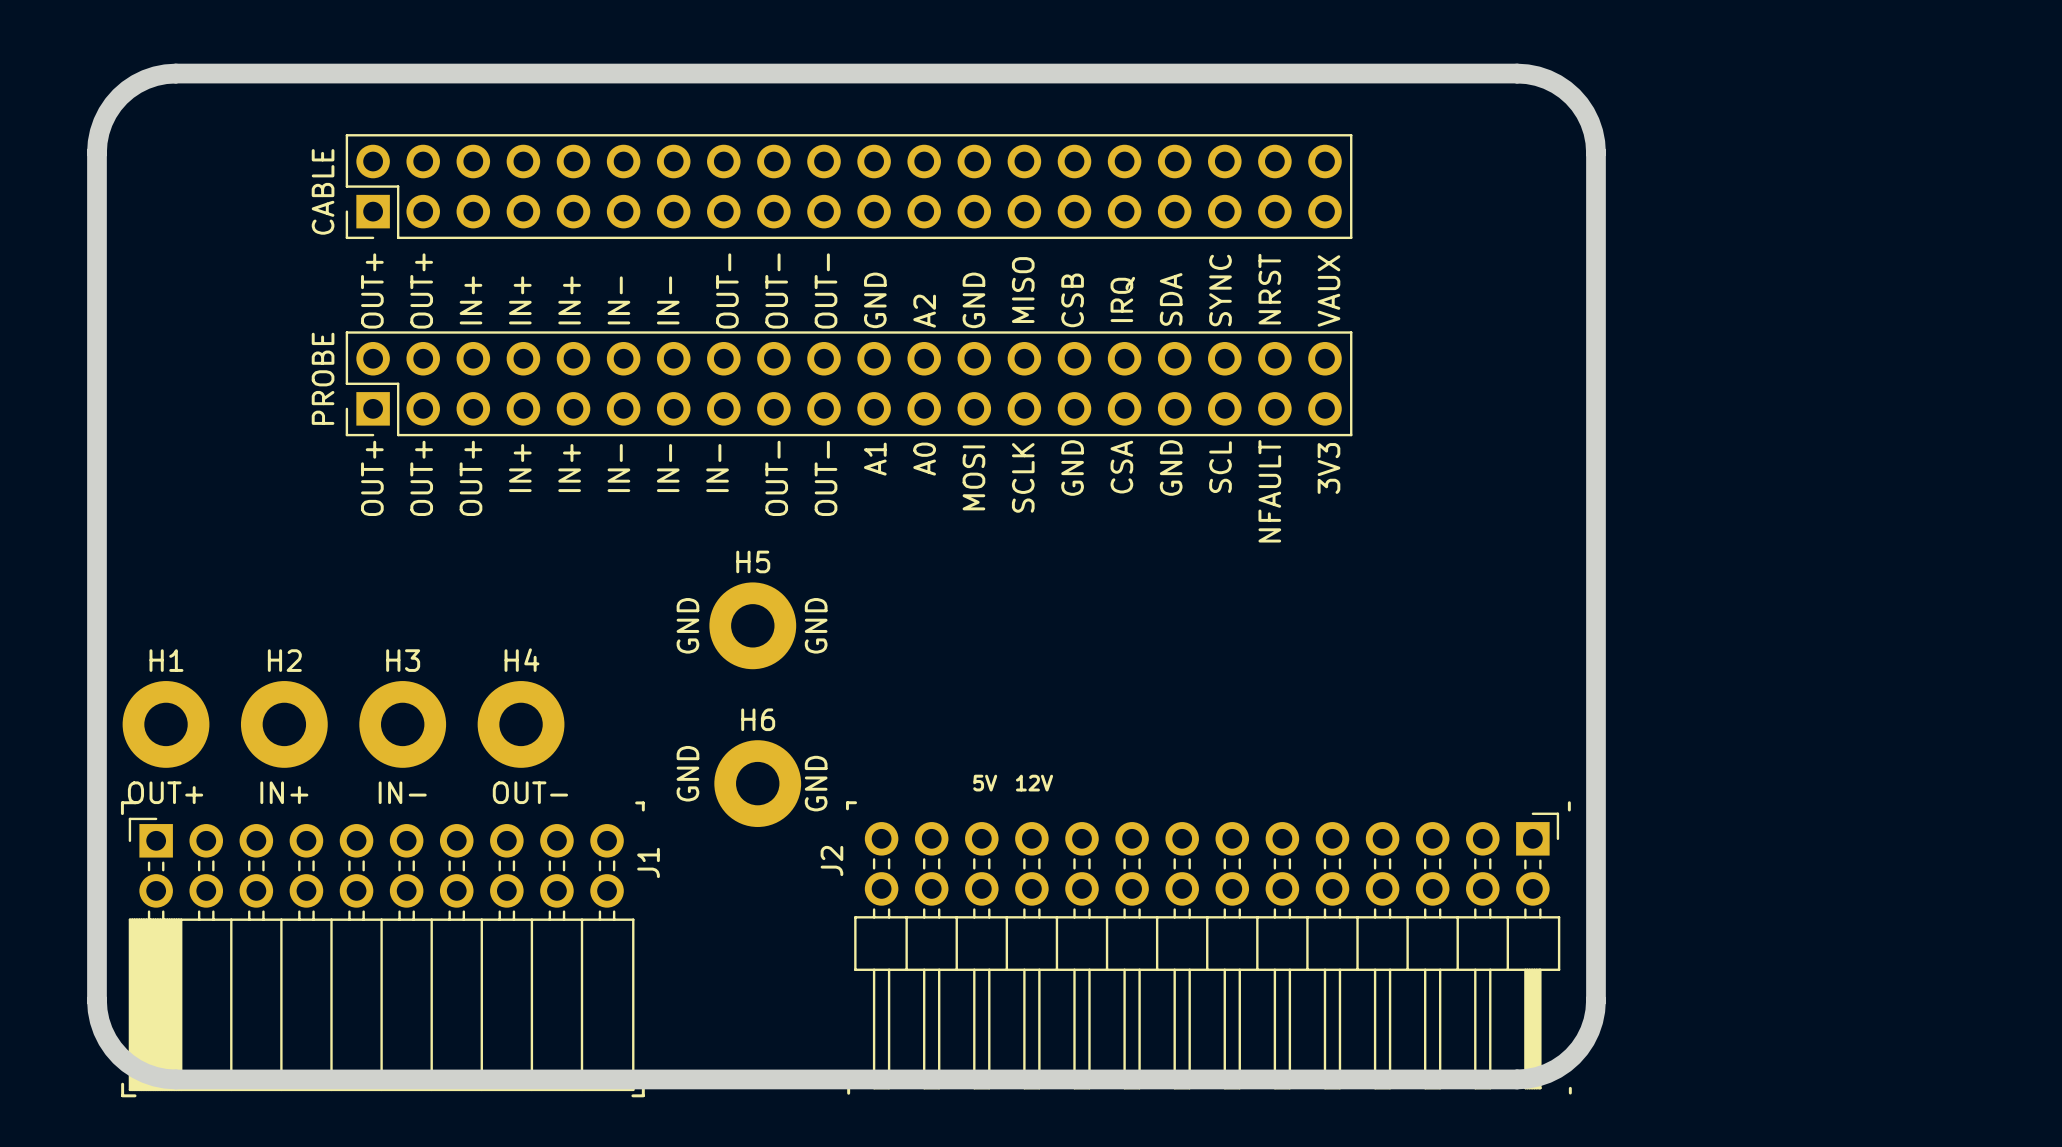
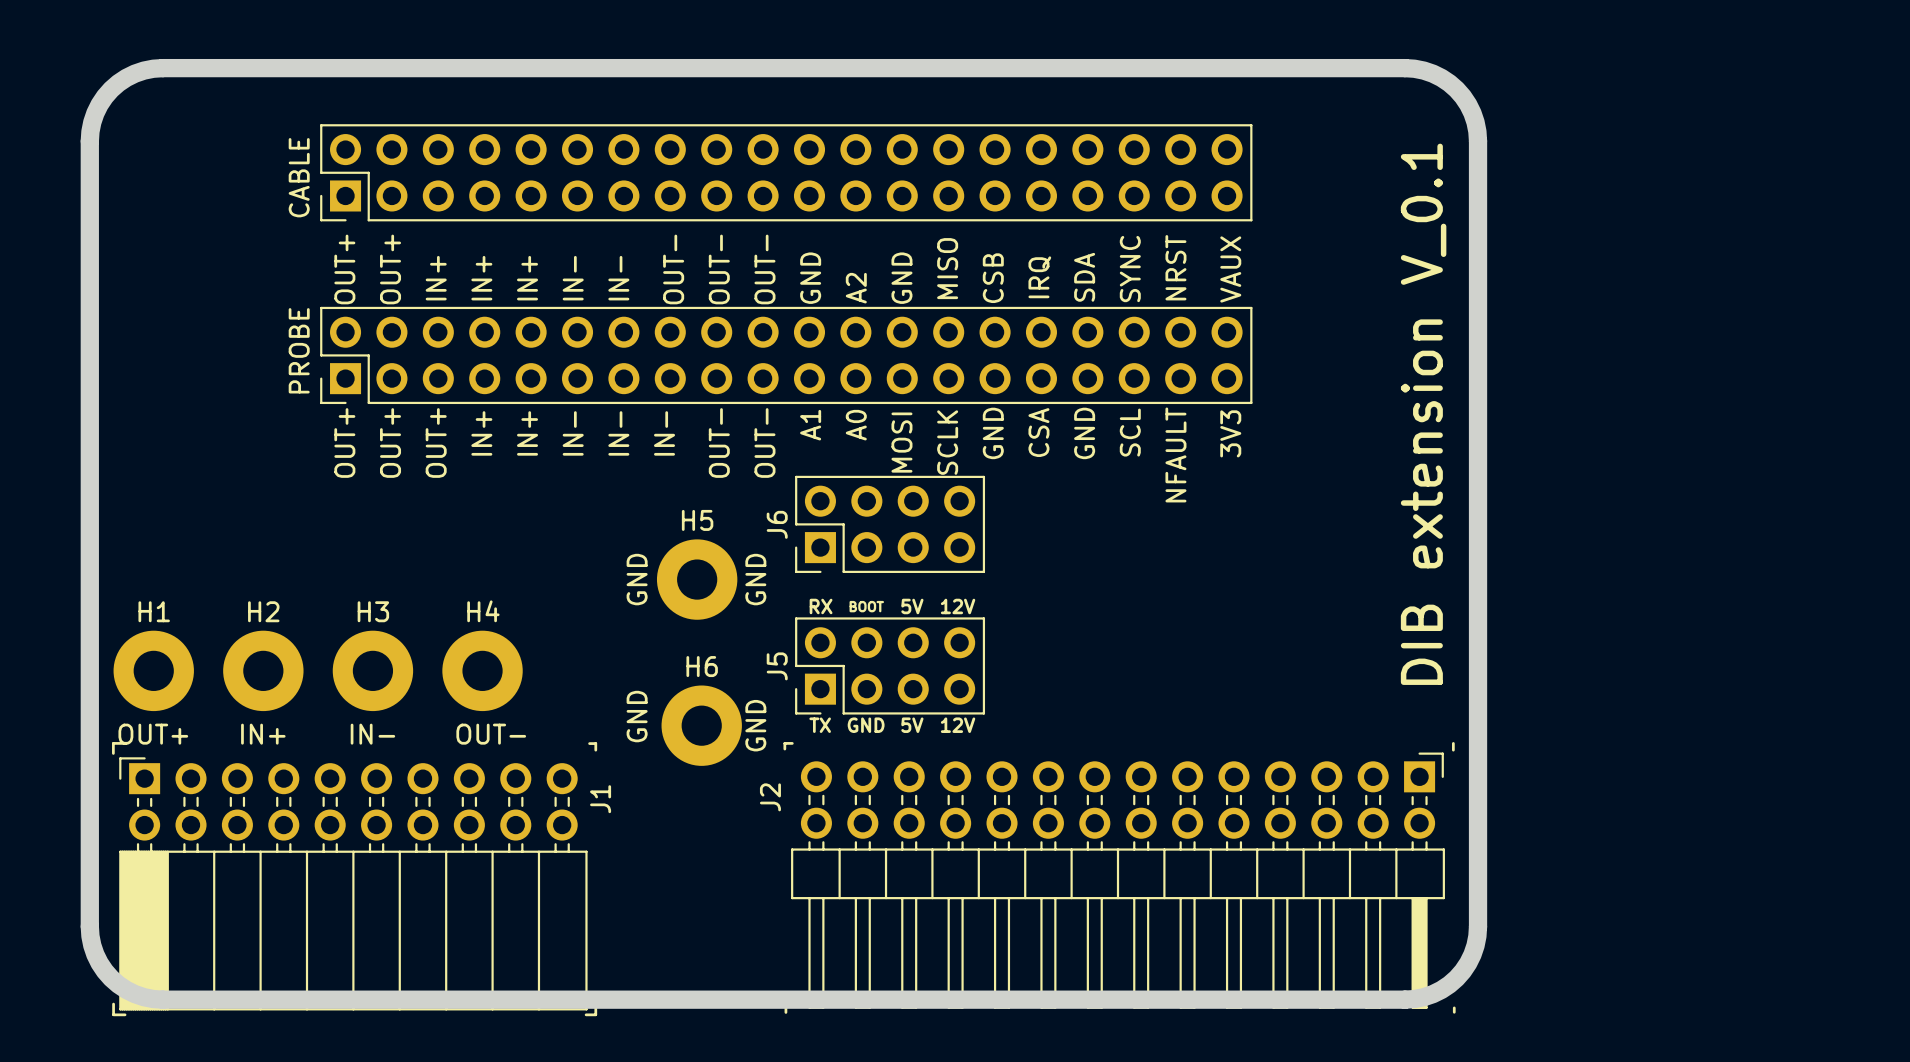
text: none -> DIB extension V_0.1 (1423, 414)
J6: none -> (890, 524)
text: none -> RX (821, 606)
text: none -> 5V (912, 606)
text: none -> 12V (958, 606)
text: none -> BOOT (866, 606)
J5: none -> (890, 665)
text: none -> TX (820, 725)
text: none -> GND (866, 725)

